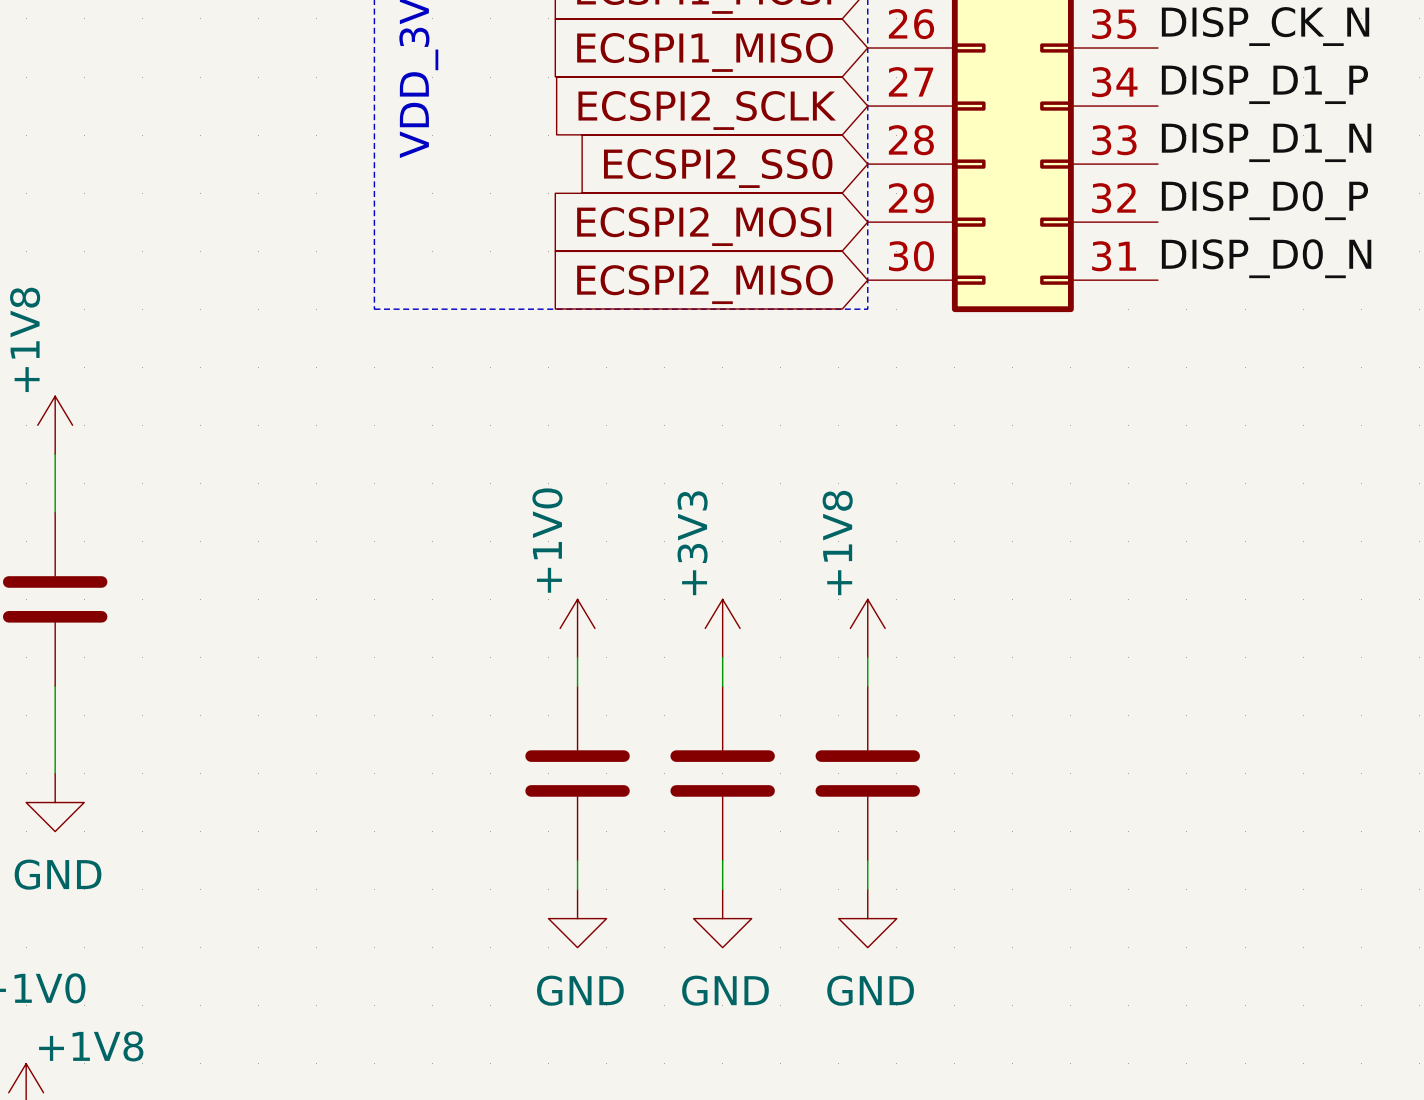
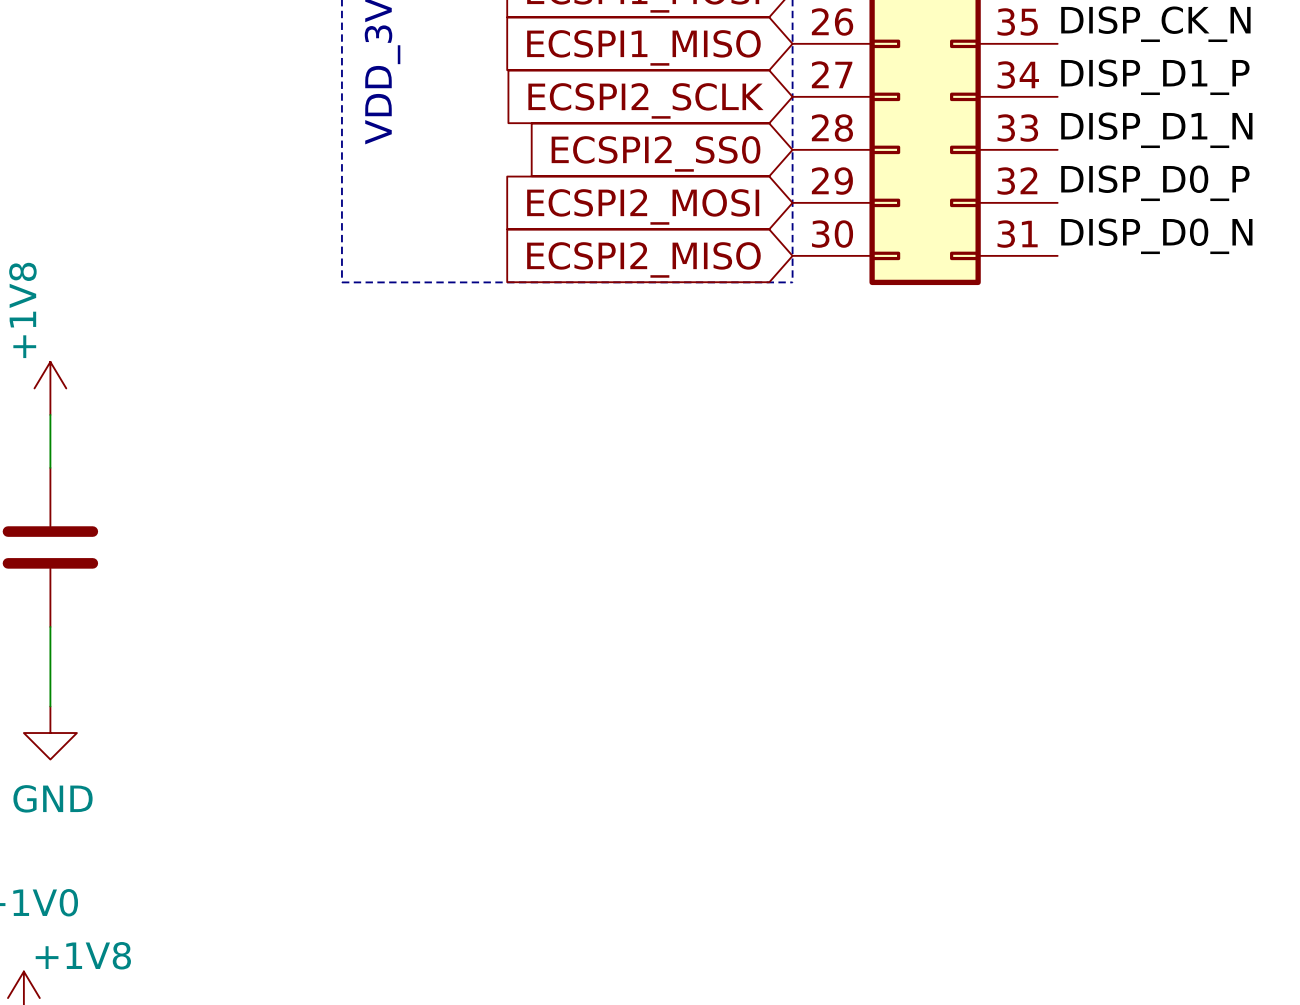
power symbol: +1V0 (577, 628) -> none
power symbol: +3V3 (722, 628) -> none
power symbol: +1V8 (867, 628) -> none
wire: (577, 657) (577, 686) -> none
wire: (722, 657) (722, 686) -> none
wire: (867, 657) (867, 686) -> none
part: (577, 773) -> none
part: (722, 773) -> none
part: (867, 773) -> none
wire: (577, 860) (577, 889) -> none
wire: (722, 860) (722, 889) -> none
wire: (867, 860) (867, 889) -> none
power symbol: GND (577, 918) -> none
power symbol: GND (722, 918) -> none
power symbol: GND (867, 918) -> none

